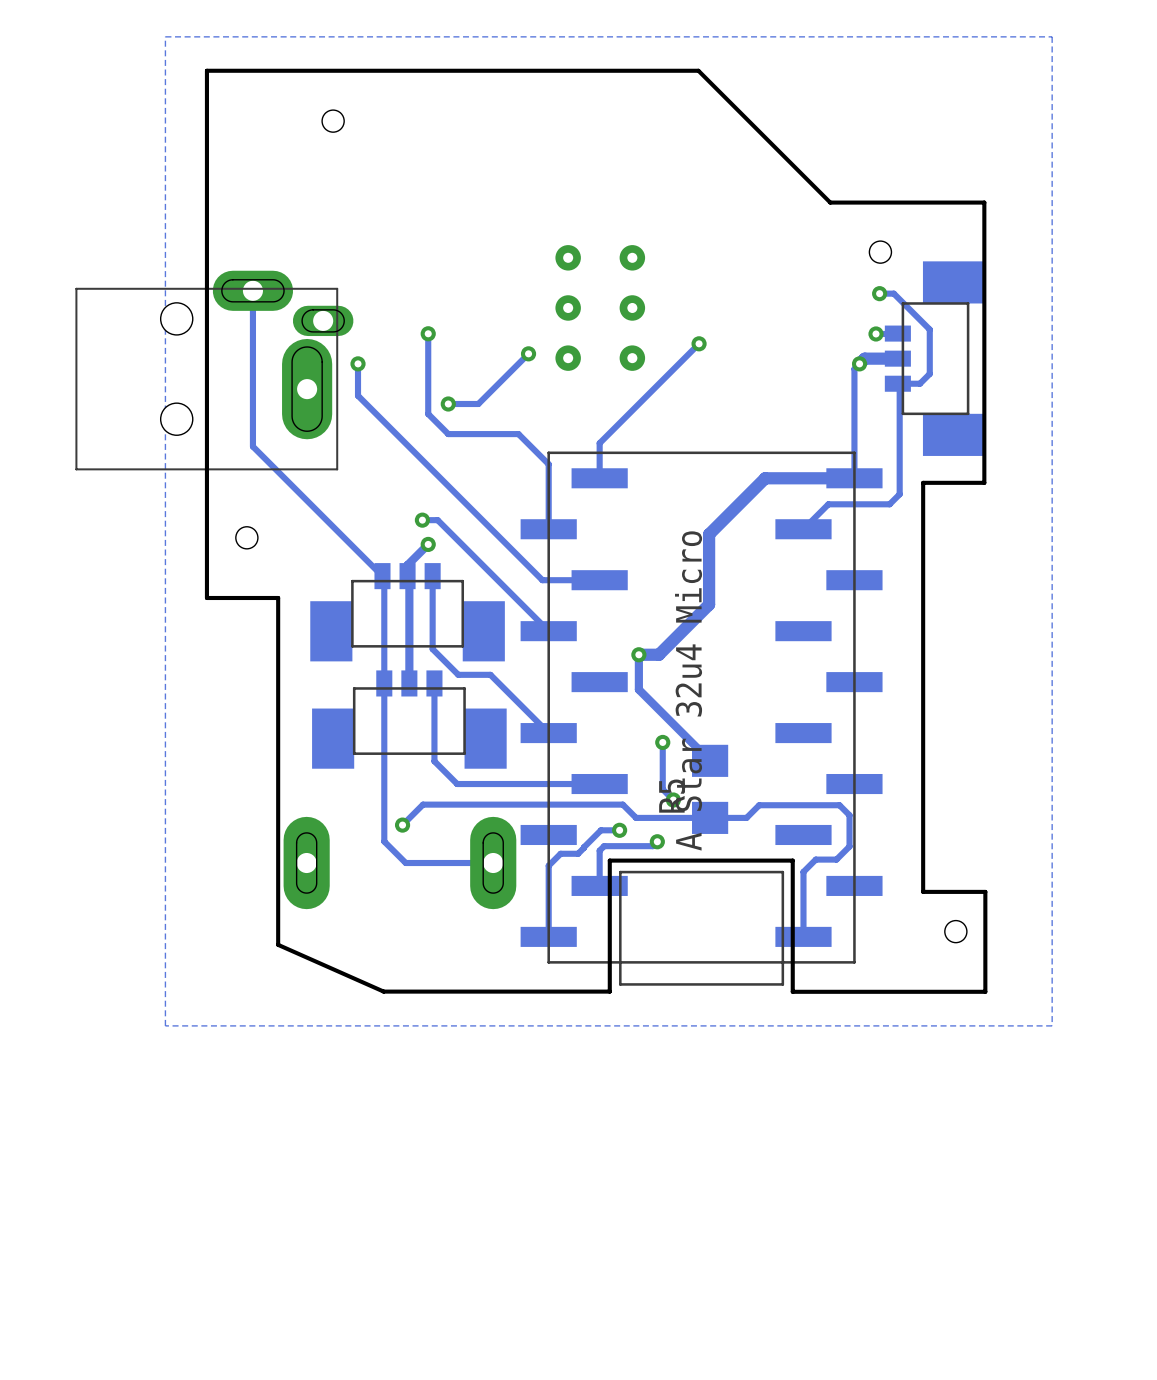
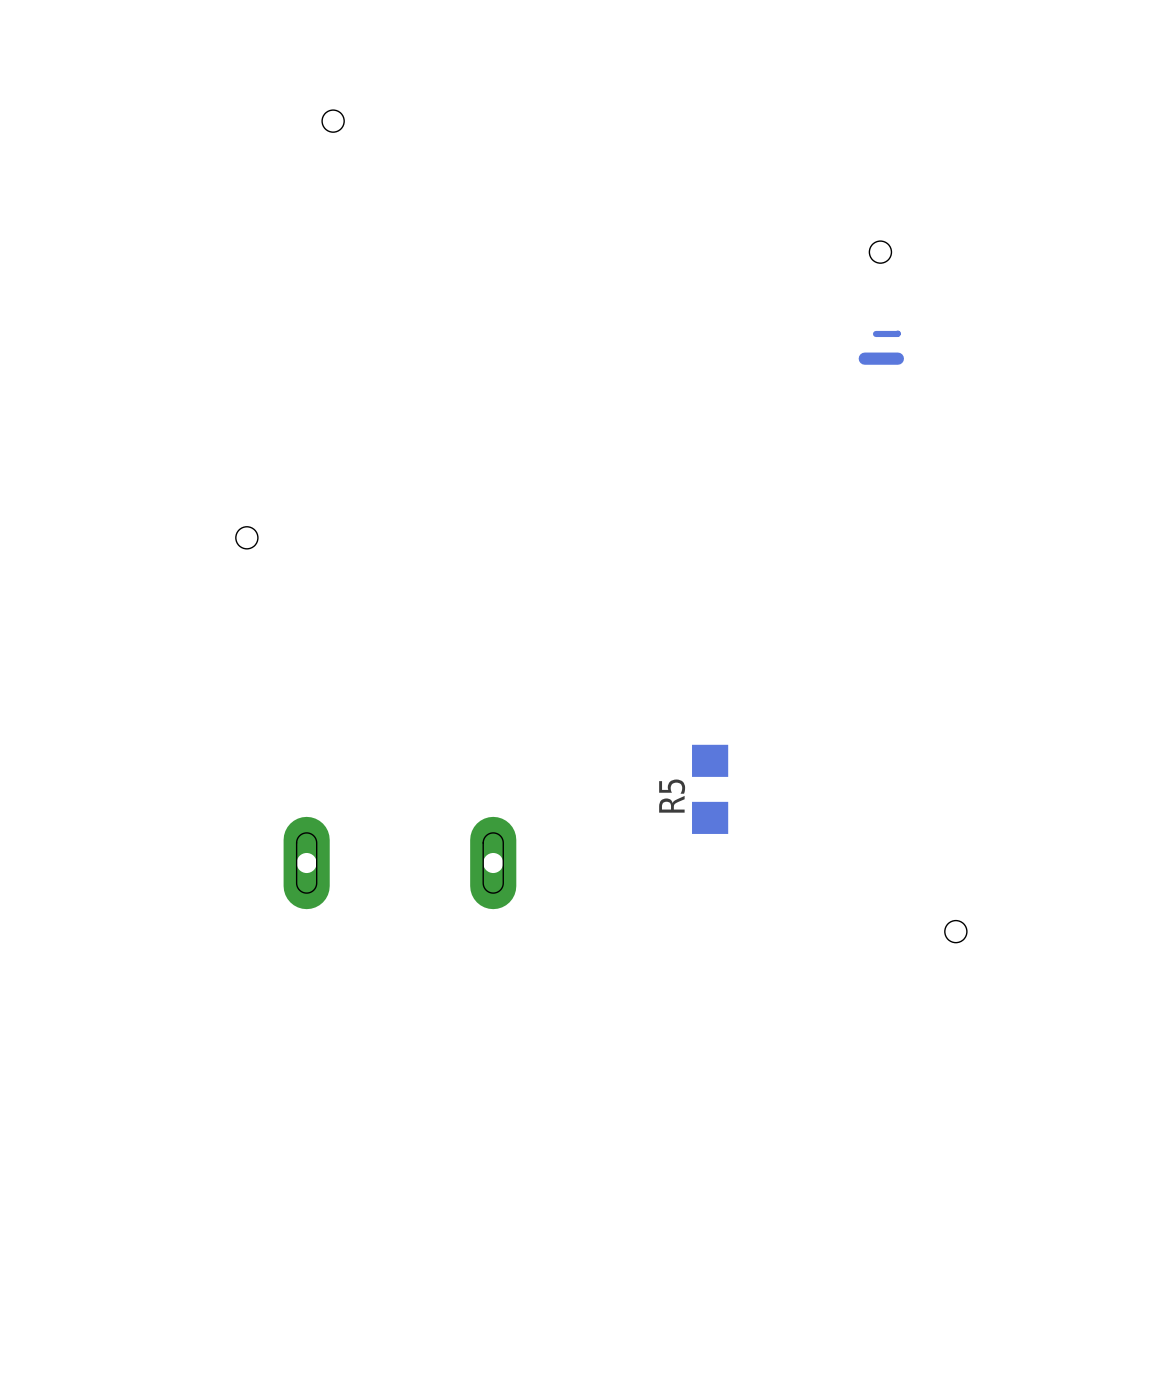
zone outline: (1052, 36) (1052, 1025) (165, 1025) (165, 36) (1052, 36) -> none
board edge: (698, 70) (206, 70) (206, 597) (278, 597) (278, 944) (383, 991) (609, 991) (609, 860) (792, 860) (792, 991) (985, 991) (985, 891) (923, 891) (923, 482) (984, 482) (984, 202) (830, 202) (698, 70) -> none
track: (252, 290) (252, 446) (384, 577) (384, 841) (405, 863) (493, 863) -> none
track: (879, 293) (893, 293) (929, 329) (929, 373) (919, 383) (897, 383) (899, 385) (899, 494) (889, 504) (828, 504) (803, 529) -> none
via: (879, 293) -> none
part: (600, 307) -> none
track: (428, 333) (428, 414) (448, 434) (518, 434) (548, 464) (548, 529) -> none
via: (428, 333) -> none
via: (876, 333) -> none
track: (699, 343) (599, 443) (599, 478) -> none
via: (699, 343) -> none
track: (528, 353) (478, 403) (448, 403) -> none
via: (528, 353) -> none
part: (933, 358) -> none
track: (358, 363) (358, 395) (542, 580) (599, 580) -> none
via: (358, 363) -> none
track: (859, 363) (864, 358) (854, 368) (854, 478) (765, 478) (709, 534) (709, 604) (658, 654) (638, 654) (638, 689) (710, 760) -> none
via: (859, 363) -> none
part: (214, 370) -> none
via: (448, 403) -> none
track: (422, 520) (437, 520) (548, 631) -> none
via: (422, 520) -> none
track: (428, 544) (407, 565) (407, 576) (409, 577) (409, 683) -> none
via: (428, 544) -> none
track: (432, 576) (432, 649) (458, 674) (490, 674) (548, 733) -> none
part: (407, 612) -> none
via: (638, 654) -> none
track: (434, 683) (434, 761) (457, 784) (599, 784) -> none
part: (701, 718) -> none
part: (409, 719) -> none
track: (662, 742) (662, 789) (673, 800) -> none
via: (662, 742) -> none
via: (673, 800) -> none
track: (402, 825) (423, 804) (622, 804) (636, 817) (746, 817) (759, 805) (839, 805) (849, 815) (849, 846) (836, 859) (815, 859) (803, 871) (803, 936) -> none
via: (402, 825) -> none
track: (619, 830) (600, 830) (578, 853) (560, 853) (548, 865) (548, 936) -> none
via: (619, 830) -> none
track: (657, 841) (652, 846) (604, 846) (599, 850) (599, 885) -> none
via: (657, 841) -> none

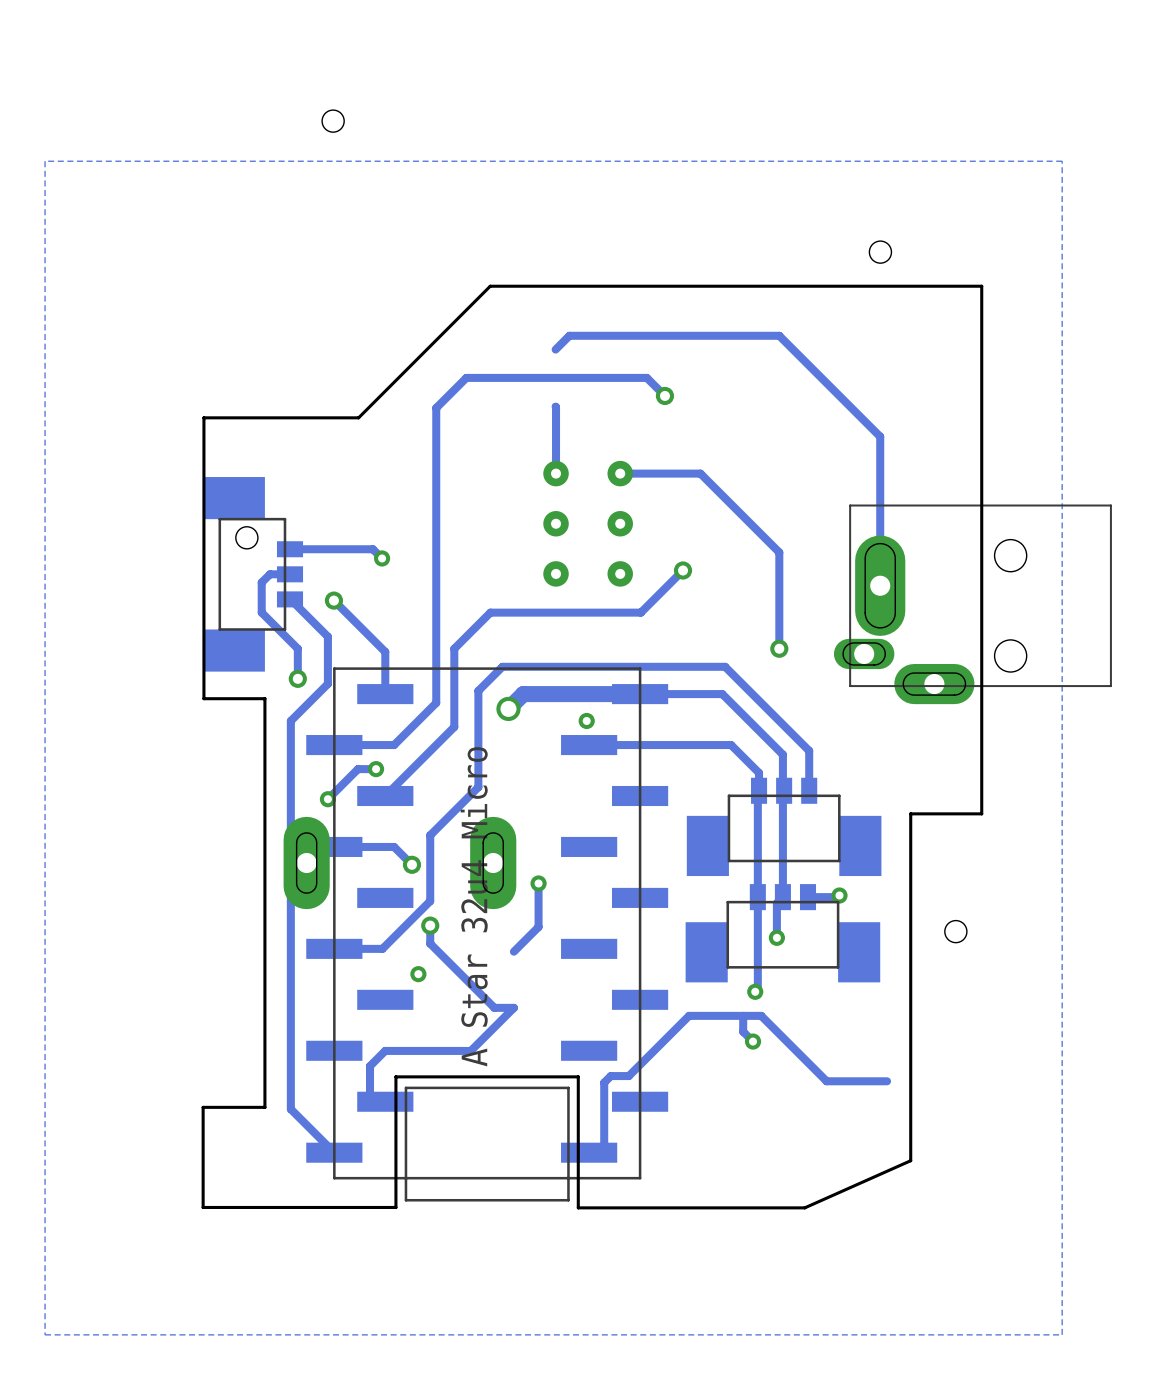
zone outline: none -> (1062, 161) (45, 161) (45, 1334) (1062, 1334) (1062, 161)
board edge: none -> (981, 286) (490, 286) (358, 417) (203, 417) (203, 698) (264, 698) (264, 1107) (203, 1107) (203, 1207) (395, 1207) (395, 1076) (578, 1076) (578, 1207) (804, 1207) (910, 1160) (910, 813) (981, 813) (981, 286)
track: (897, 333) (876, 333) -> none
track: none -> (555, 349) (569, 335) (779, 335) (880, 436) (880, 585)
track: (897, 358) (864, 358) -> none
track: none -> (664, 395) (646, 377) (466, 377) (436, 408) (436, 702) (394, 745) (334, 745)
via: none -> (664, 395)
track: none -> (555, 406) (556, 473)
track: none -> (620, 473) (700, 473) (779, 552) (779, 648)
part: none -> (588, 523)
track: none -> (290, 549) (372, 549) (382, 558)
via: none -> (382, 558)
track: none -> (683, 570) (640, 612) (490, 612) (454, 648) (454, 726) (385, 796)
via: none -> (683, 570)
part: none -> (253, 574)
track: none -> (290, 574) (269, 574) (261, 582) (261, 612) (297, 648) (297, 678)
track: none -> (290, 599) (327, 636) (327, 683) (290, 720) (290, 1109) (334, 1152)
track: none -> (333, 600) (385, 651) (385, 694)
via: none -> (333, 600)
part: none -> (972, 604)
via: none -> (779, 648)
via: none -> (297, 678)
track: none -> (508, 708) (523, 694) (722, 694) (782, 754) (782, 897) (776, 903) (776, 937)
via: none -> (508, 708)
via: none -> (586, 720)
track: none -> (589, 745) (731, 745) (759, 772) (757, 989) (755, 991)
track: none -> (376, 769) (358, 769) (327, 799)
via: none -> (376, 769)
R5: (710, 789) -> none
track: none -> (809, 790) (809, 750) (725, 666) (502, 666) (478, 690) (478, 787) (430, 835) (430, 901) (382, 948) (334, 948)
via: none -> (327, 799)
part: none -> (784, 826)
track: none -> (334, 846) (394, 846) (411, 864)
via: none -> (411, 864)
track: none -> (538, 883) (538, 927) (513, 951)
via: none -> (538, 883)
track: none -> (839, 895) (837, 897) (808, 897)
via: none -> (839, 895)
track: none -> (430, 925) (430, 943) (494, 1007) (513, 1007) (470, 1050) (385, 1050) (370, 1066) (370, 1101)
via: none -> (430, 925)
part: none -> (782, 933)
part: none -> (487, 934)
via: none -> (776, 937)
via: none -> (418, 974)
via: none -> (755, 991)
track: none -> (743, 1015) (743, 1031) (753, 1041)
via: none -> (753, 1041)
track: none -> (887, 1081) (826, 1081) (761, 1015) (689, 1015) (628, 1076) (610, 1076) (604, 1082) (604, 1152)

